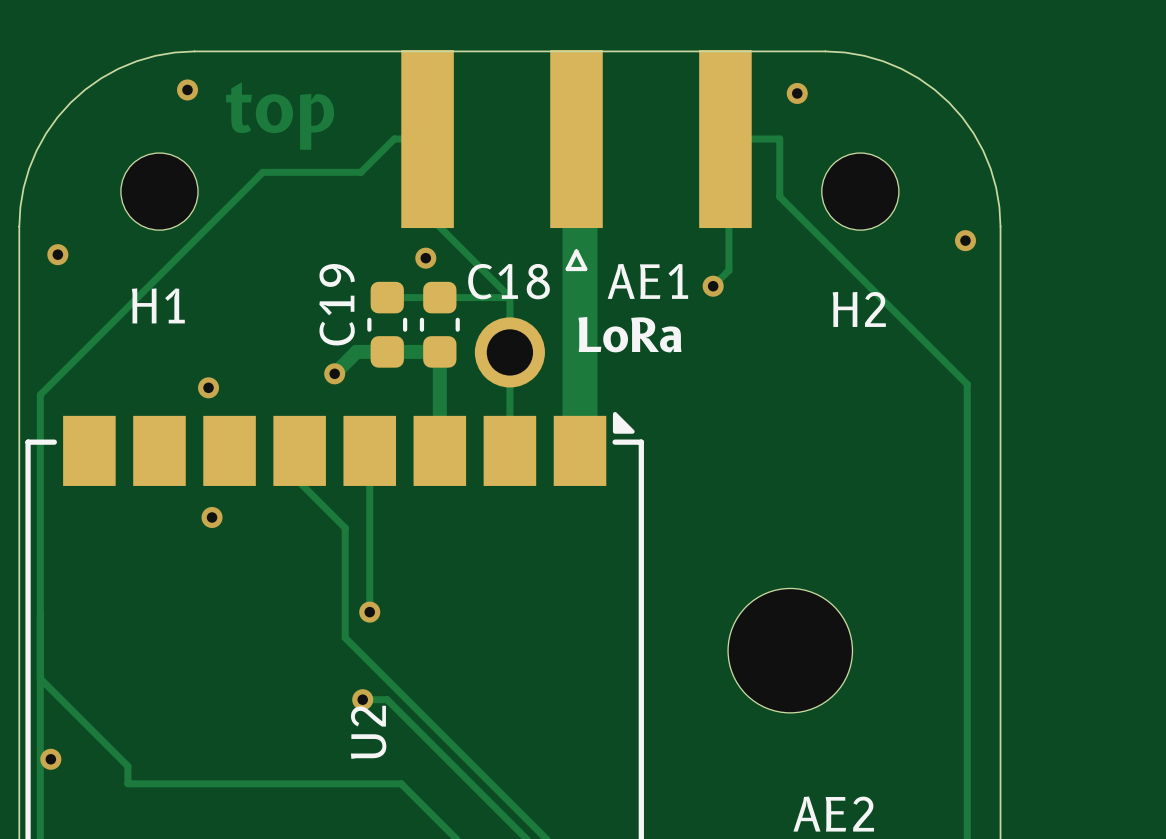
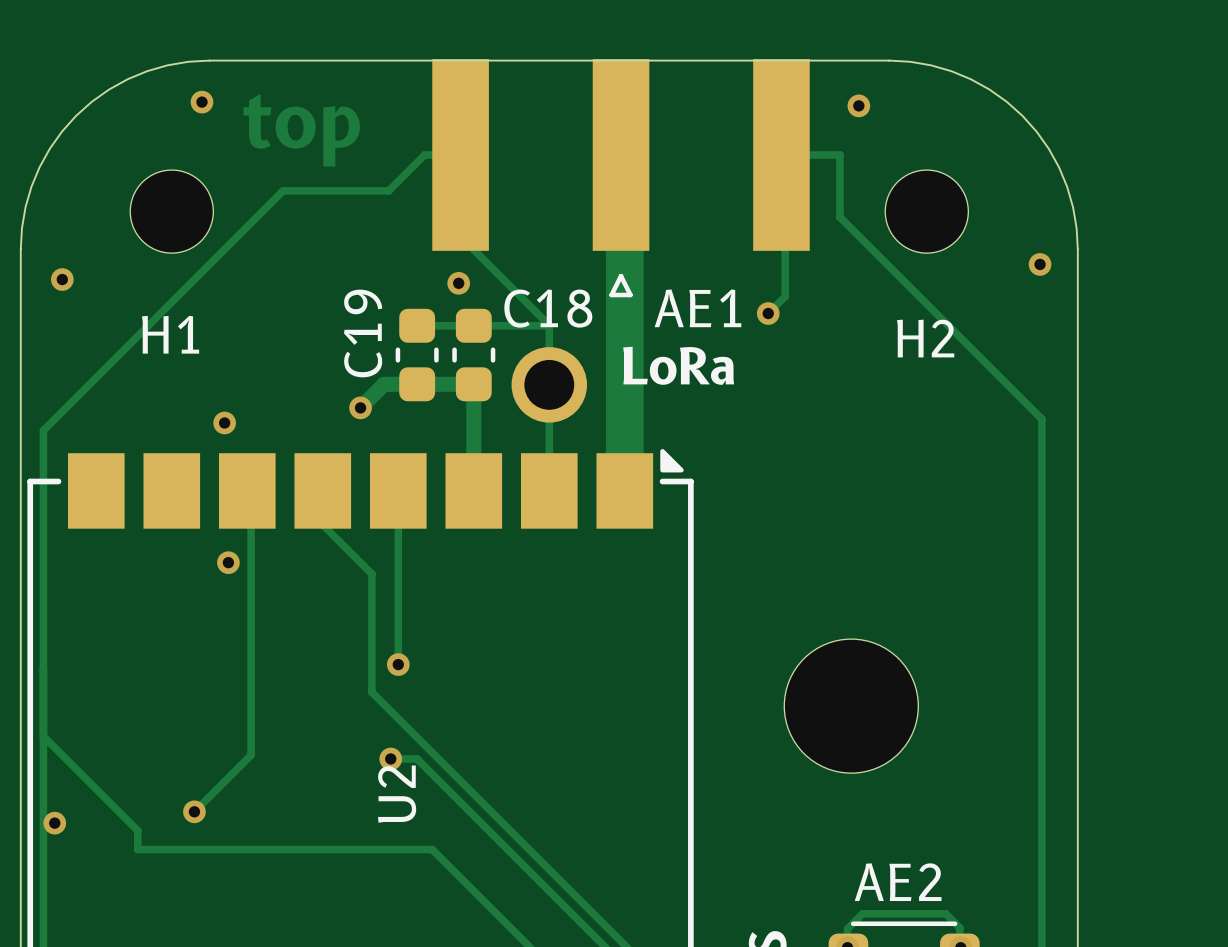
track: none -> (247, 490) (251, 494) (251, 755) (194, 811)
via: none -> (194, 811)

